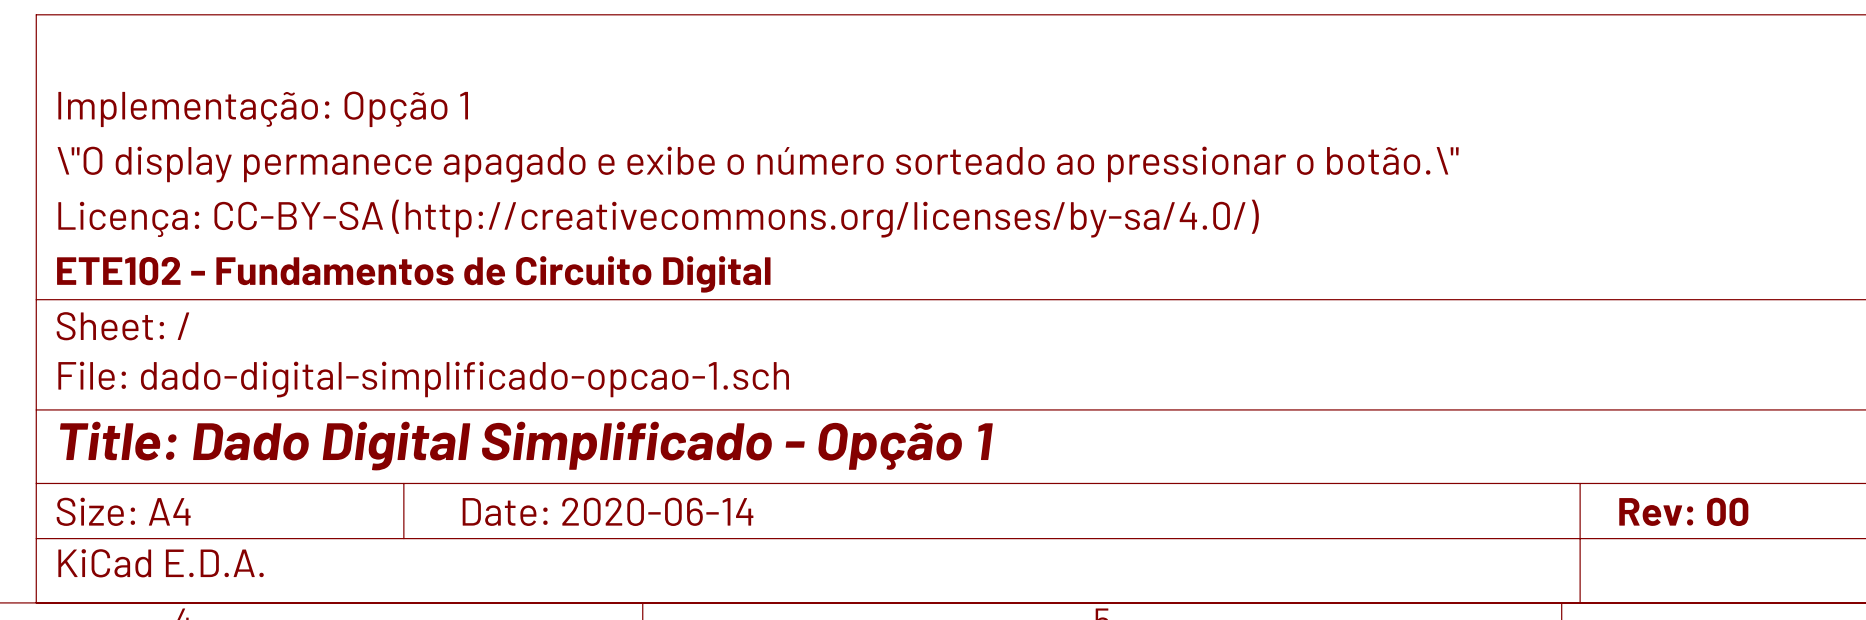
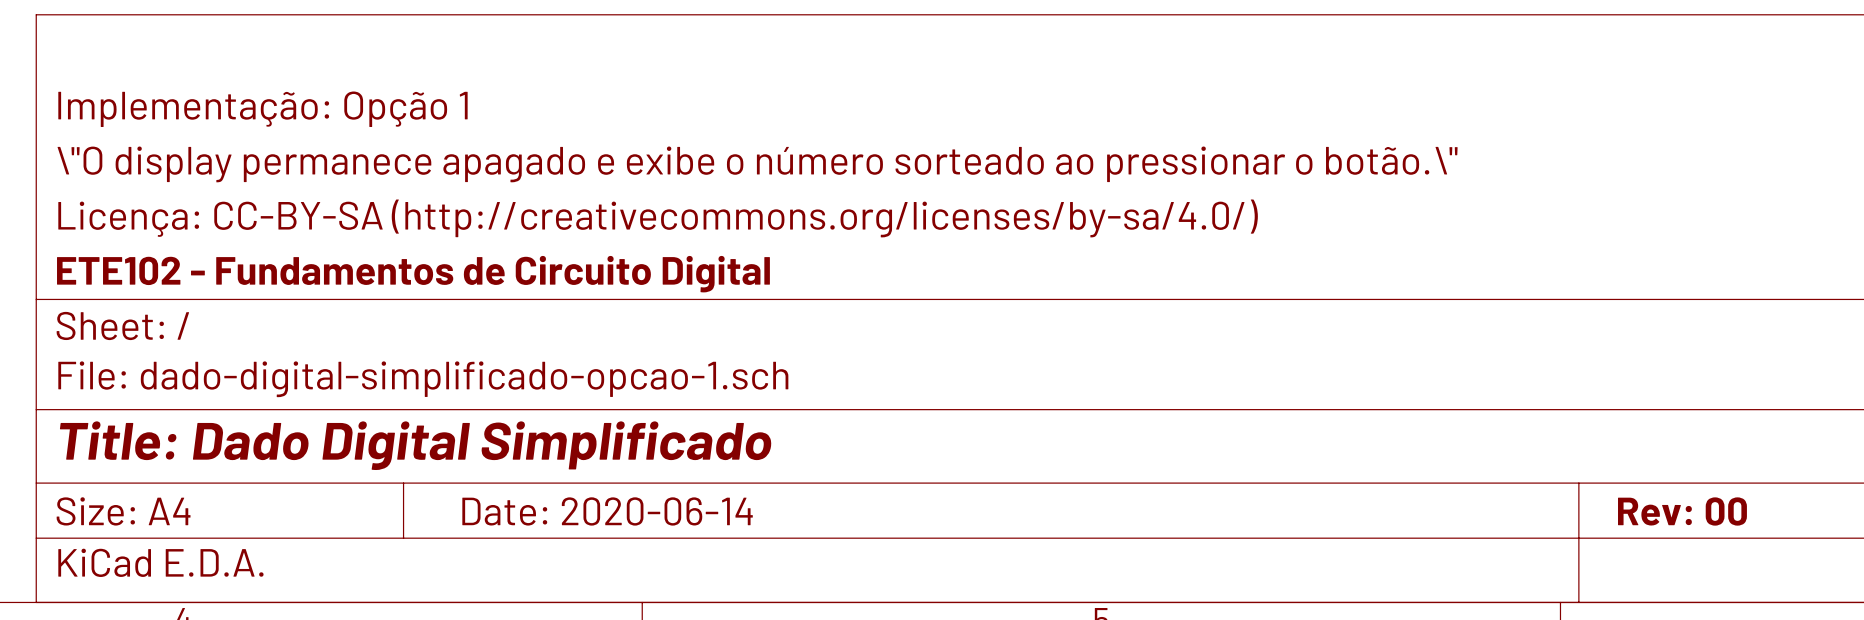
title block: Title: Dado Digital Simplificado - Opção 1 (526, 446) -> Title: Dado Digital Simplificado (415, 445)

